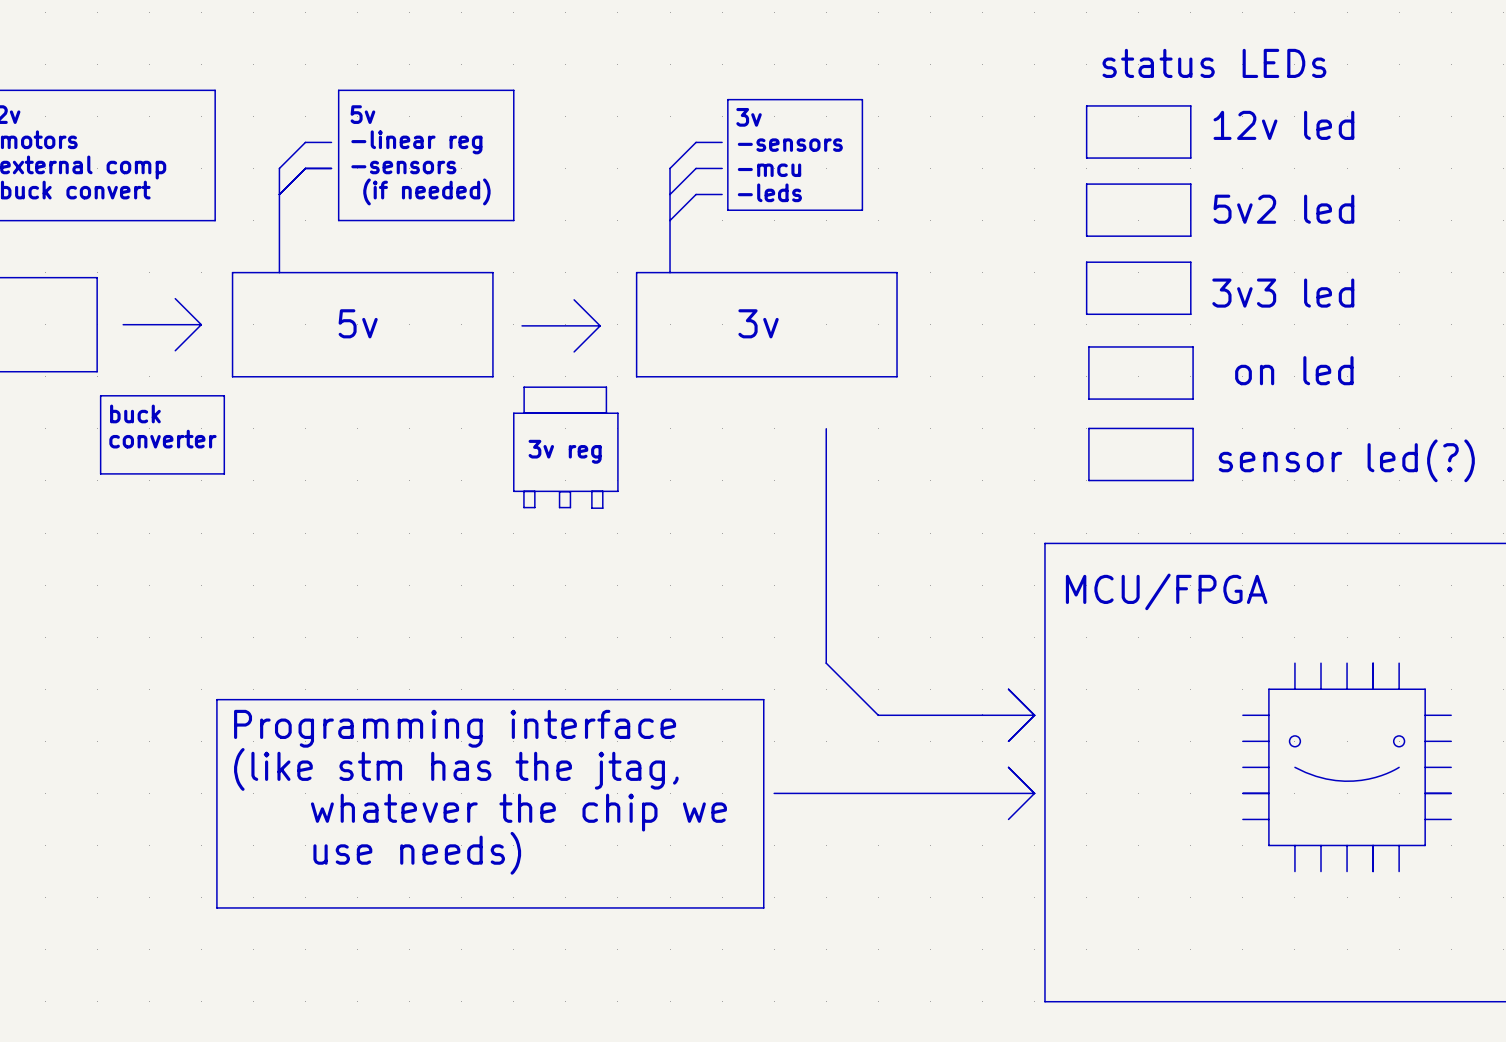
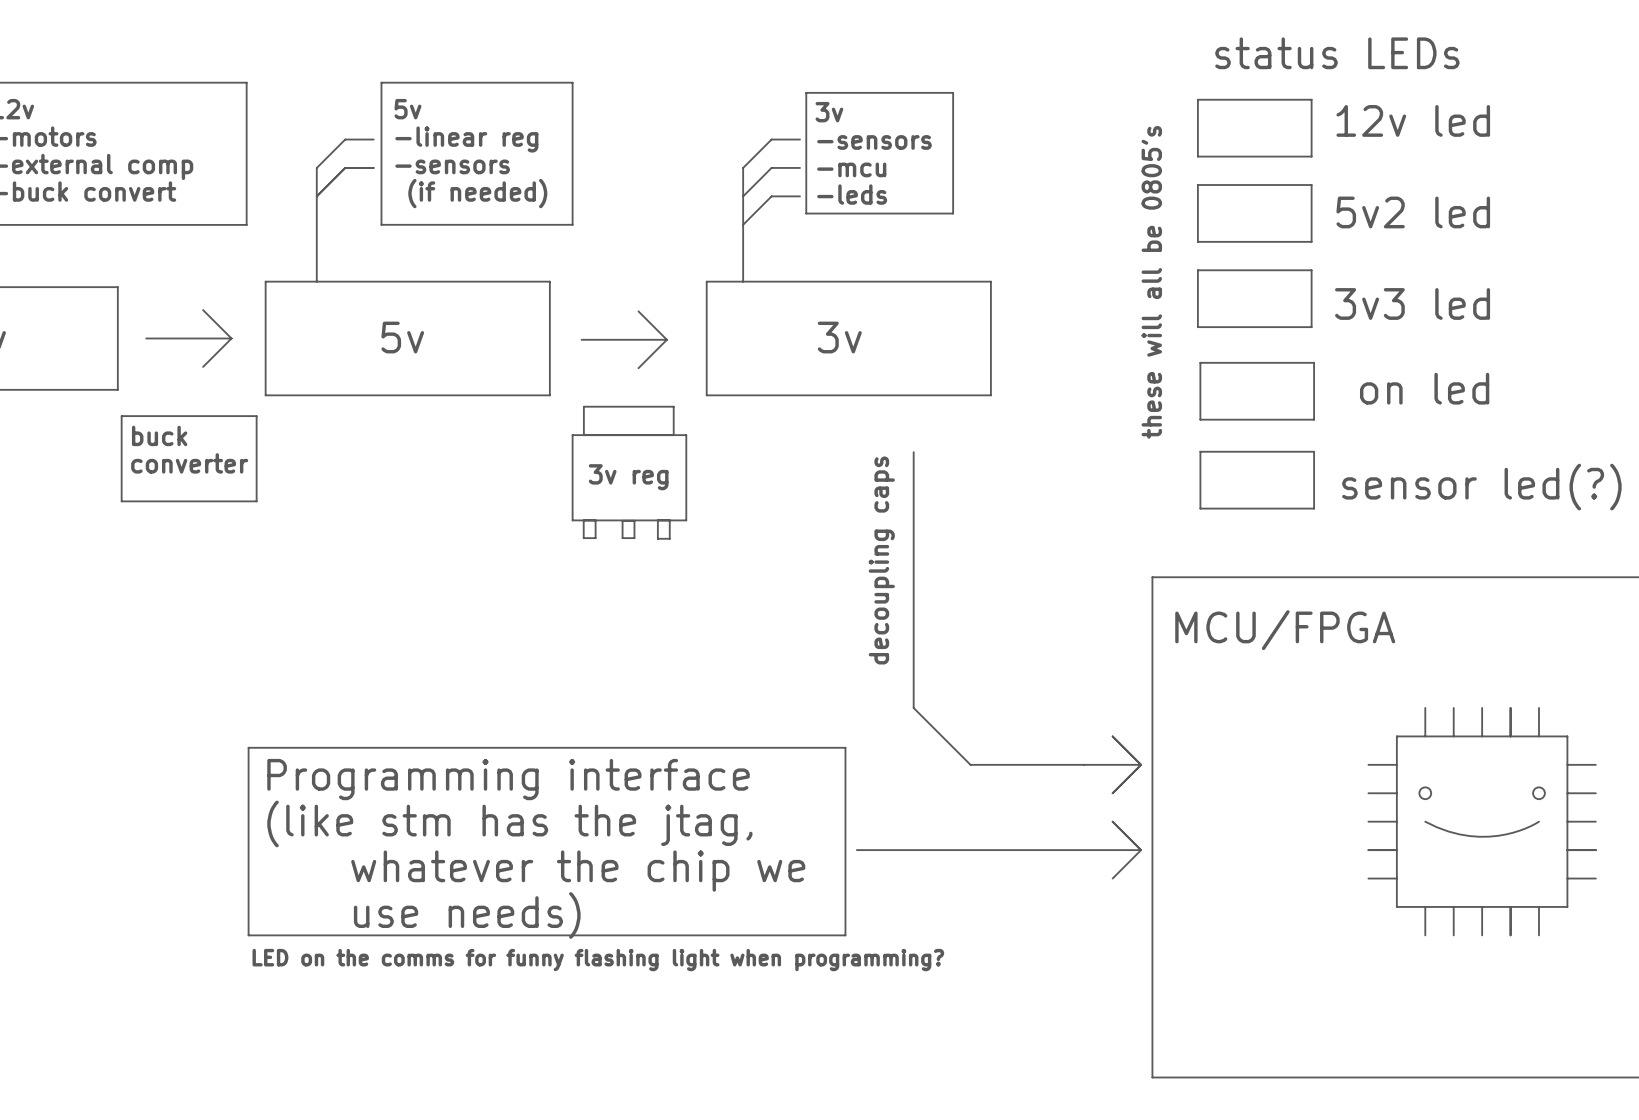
text: none -> these will all be 0805's (1151, 282)
text: none -> decoupling caps (881, 560)
line: (216, 871) (216, 907) (763, 907) (763, 871) -> (248, 935) (845, 935)
text: none -> LED on the comms for funny flashing light when programming? (598, 960)

